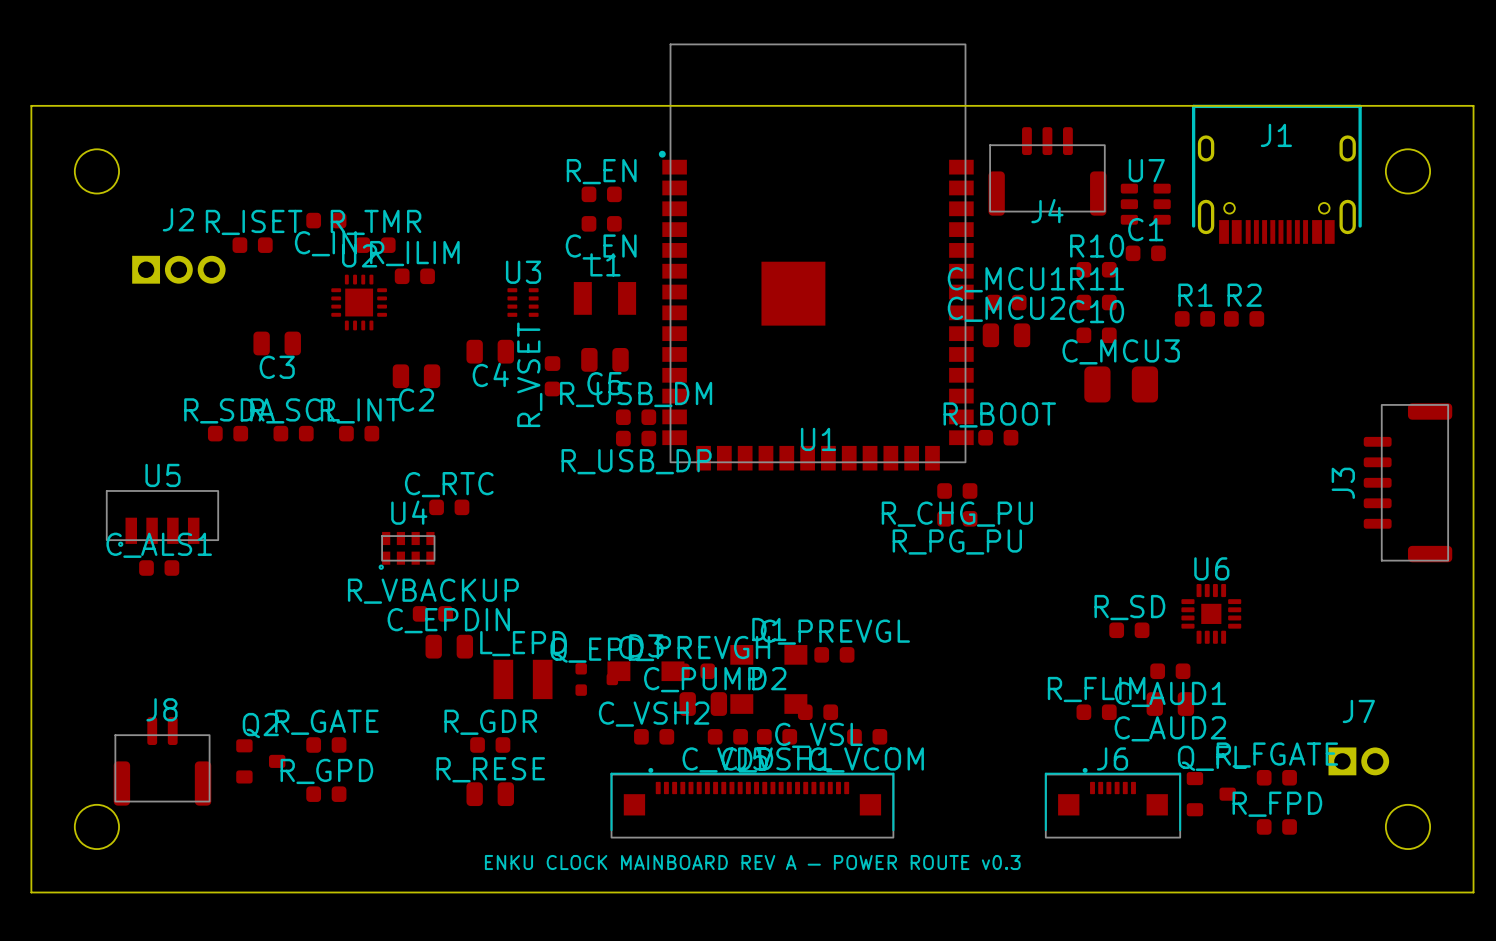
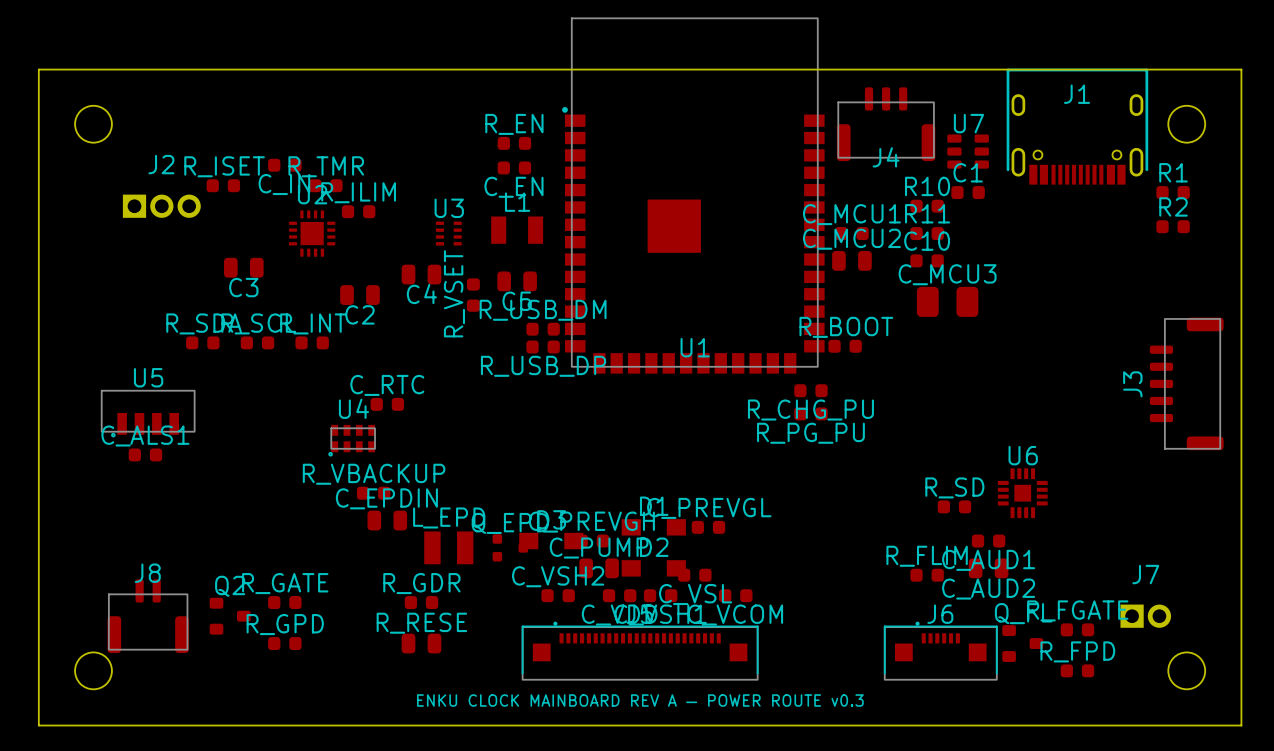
R1 position: (1194, 318) -> (1173, 192)
R2 position: (1244, 318) -> (1173, 226)

